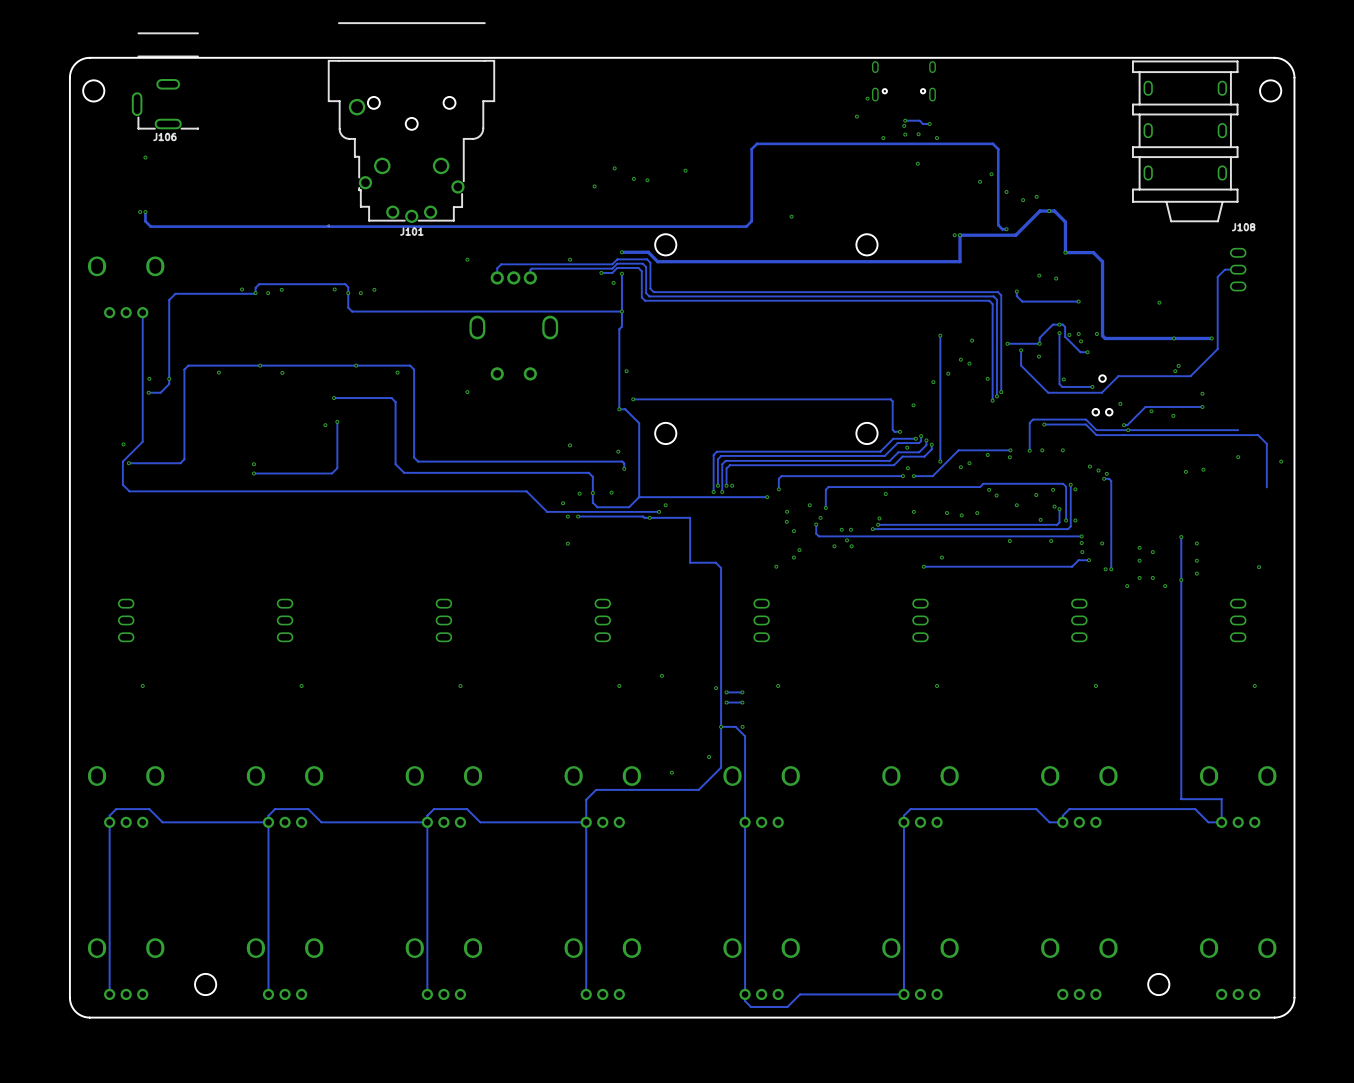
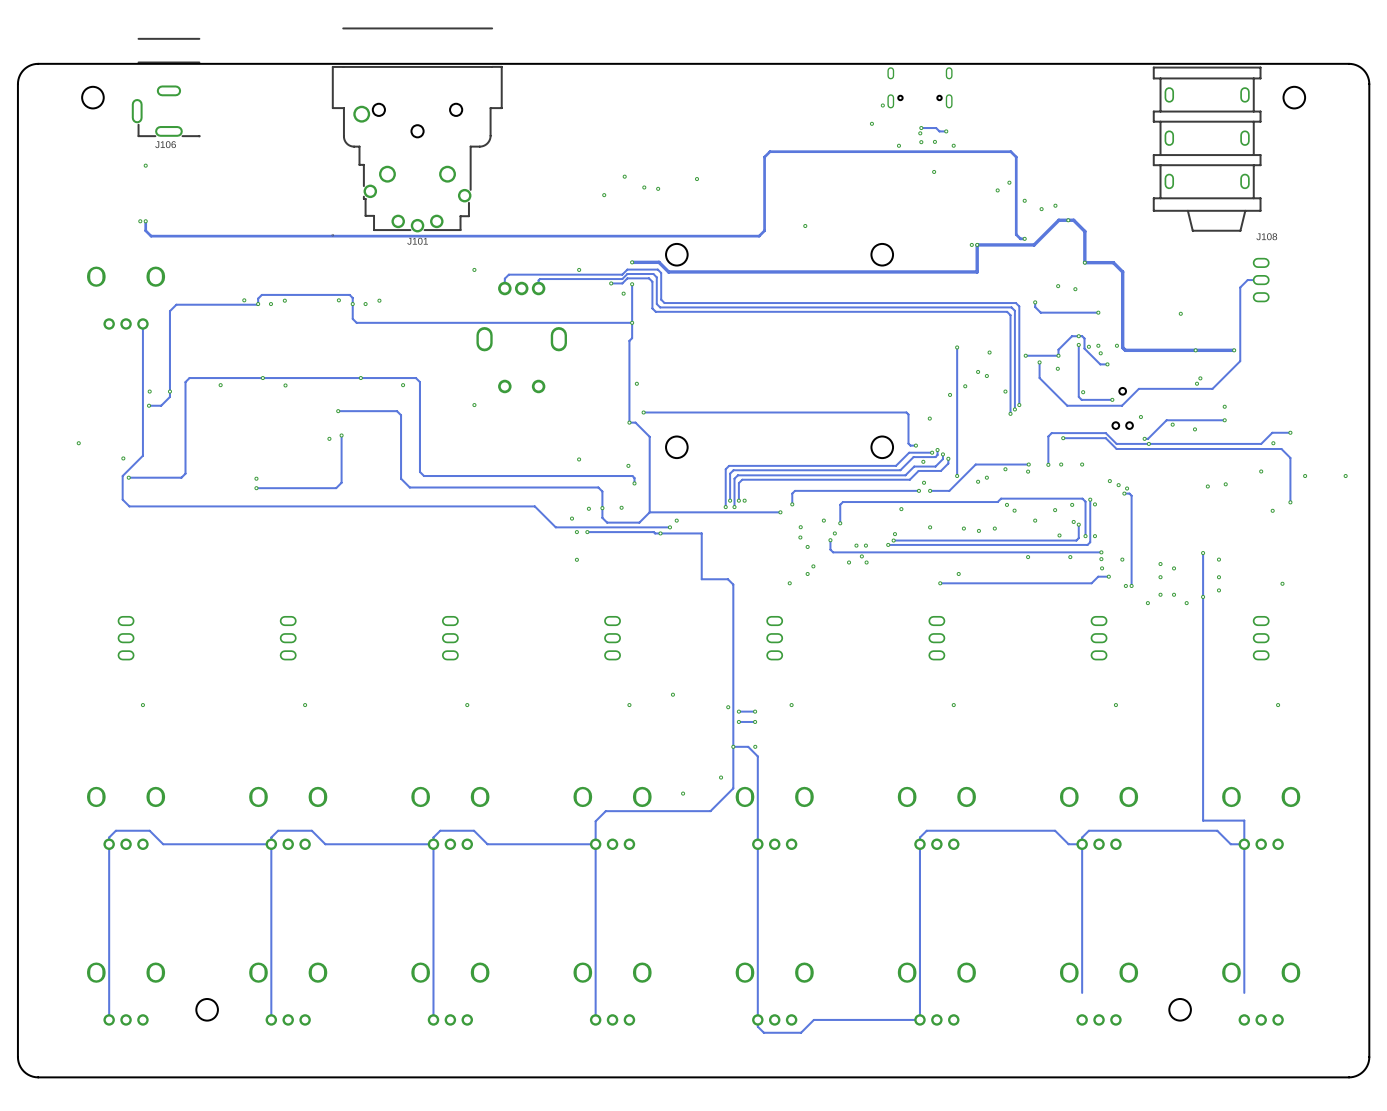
board edge: (1274, 57) (1288, 63) (1294, 77) (1294, 997) (1288, 1011) (1274, 1017) (89, 1017) (77, 1013) (71, 1005) (69, 997) (69, 77) (75, 63) (89, 57) -> (1298, 63) (1353, 64) (1364, 71) (1369, 84) (1369, 1057) (1368, 1063) (1363, 1071) (1355, 1076) (1349, 1077) (38, 1077) (25, 1073) (20, 1067) (17, 1057) (18, 81) (23, 69) (33, 64) (88, 63)
track: none -> (1290, 432) (1272, 432) (1261, 443)
via: none -> (1290, 432)
via: none -> (78, 443)
via: none -> (1273, 443)
via: none -> (1345, 476)
via: none -> (1290, 502)
via: none -> (1272, 510)
track: none -> (1082, 844) (1082, 992)
track: none -> (1244, 844) (1244, 992)

